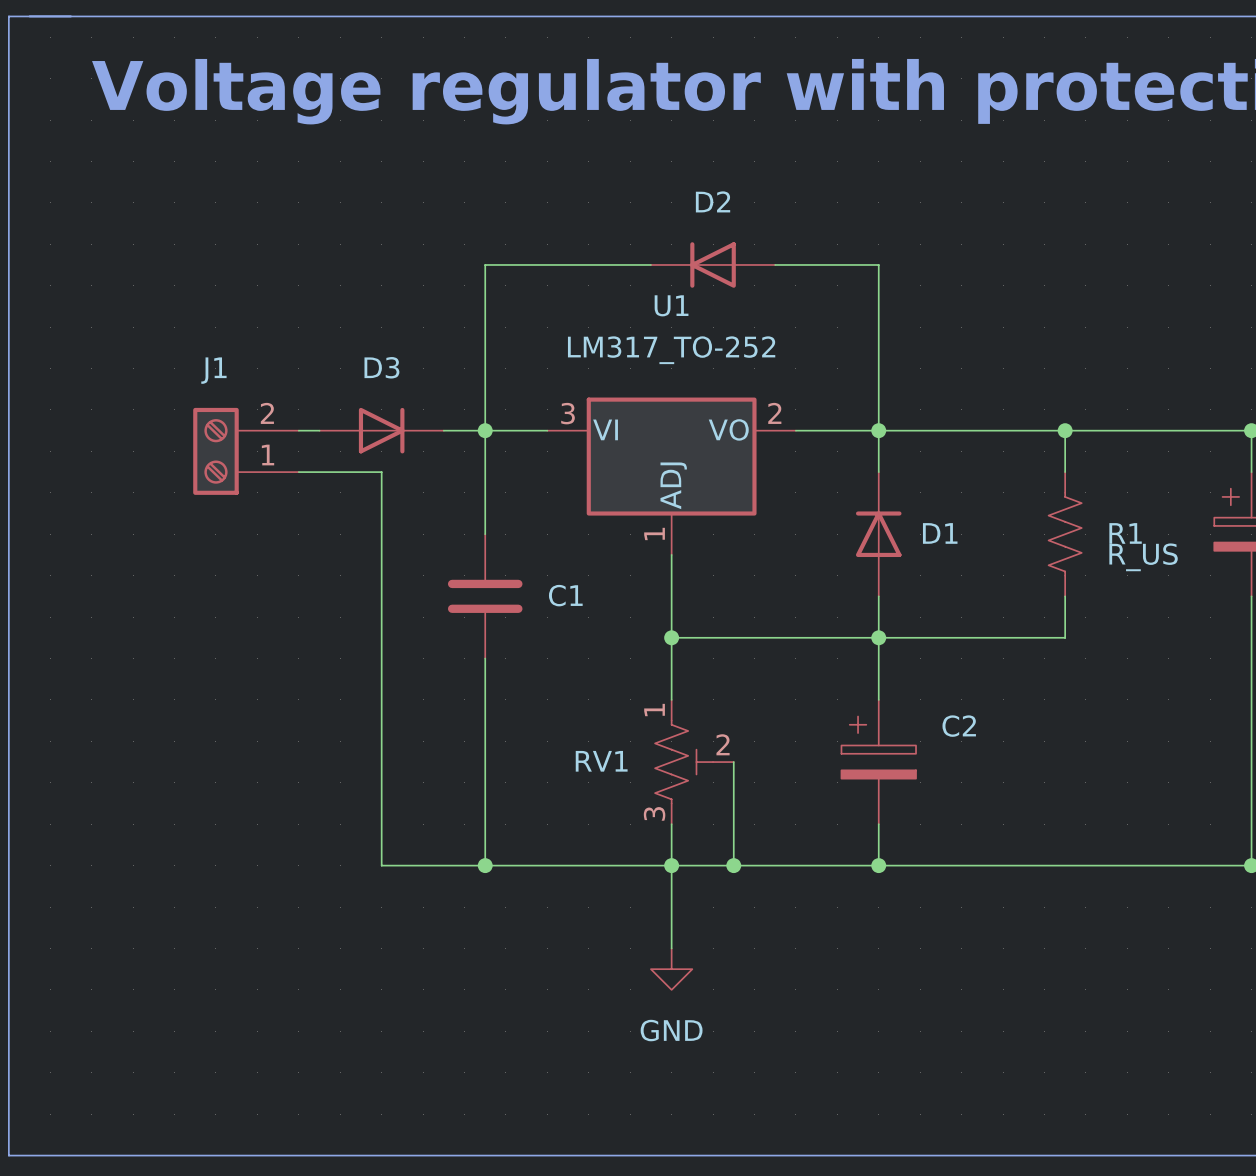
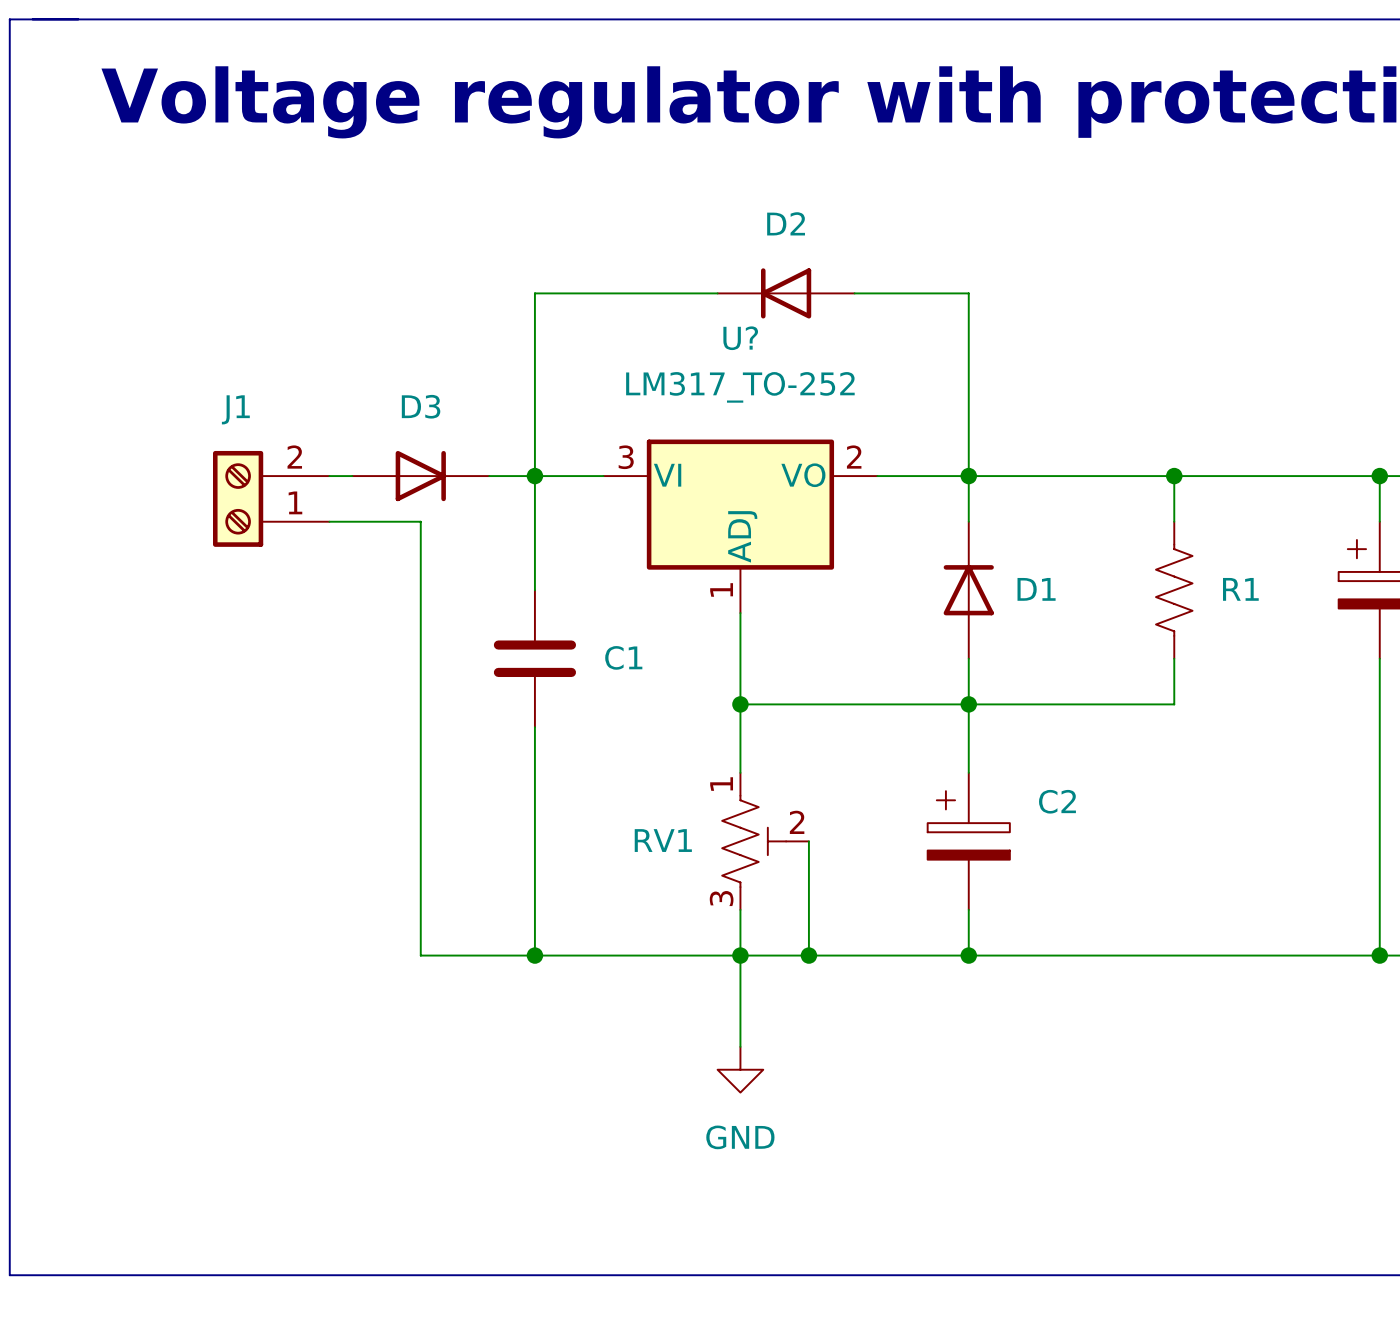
U1 name: U1 (671, 305) -> U? (740, 338)
R1 value: R_US (1143, 557) -> none

